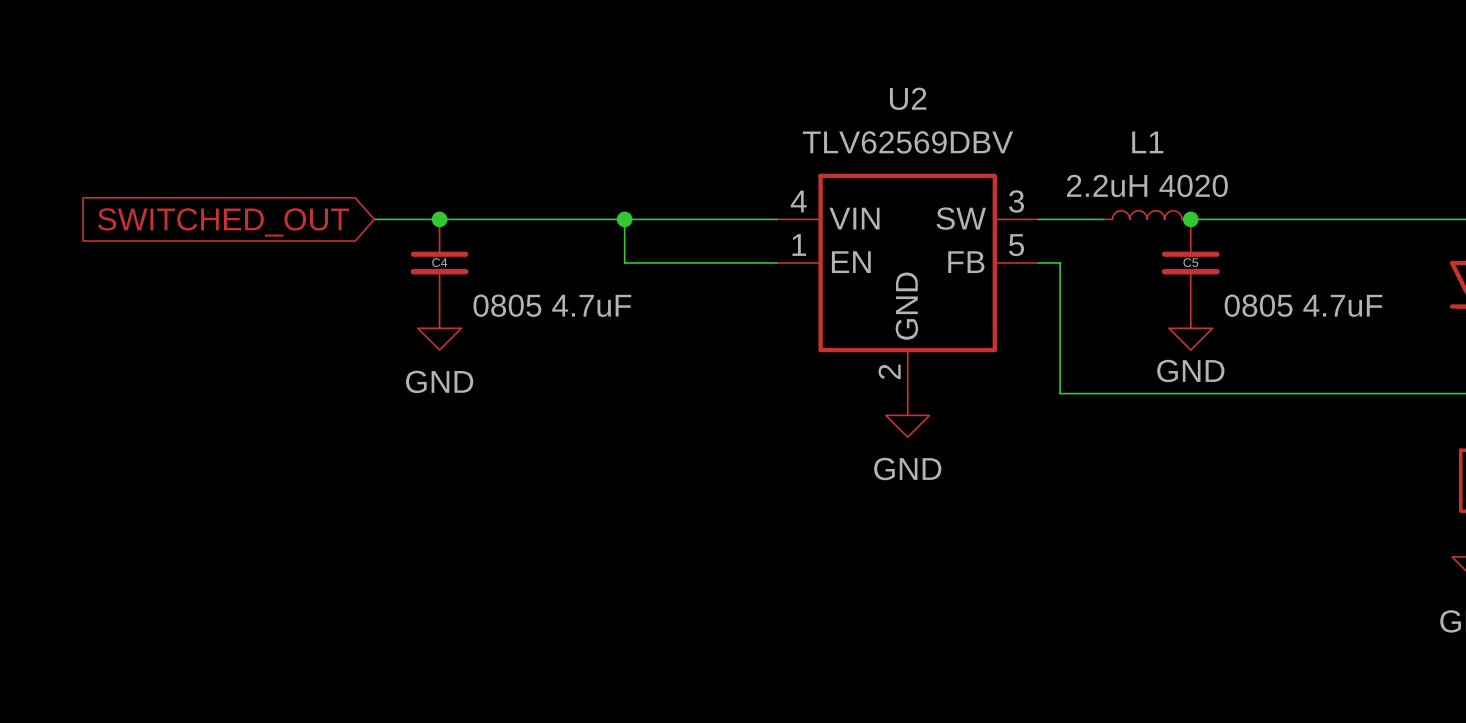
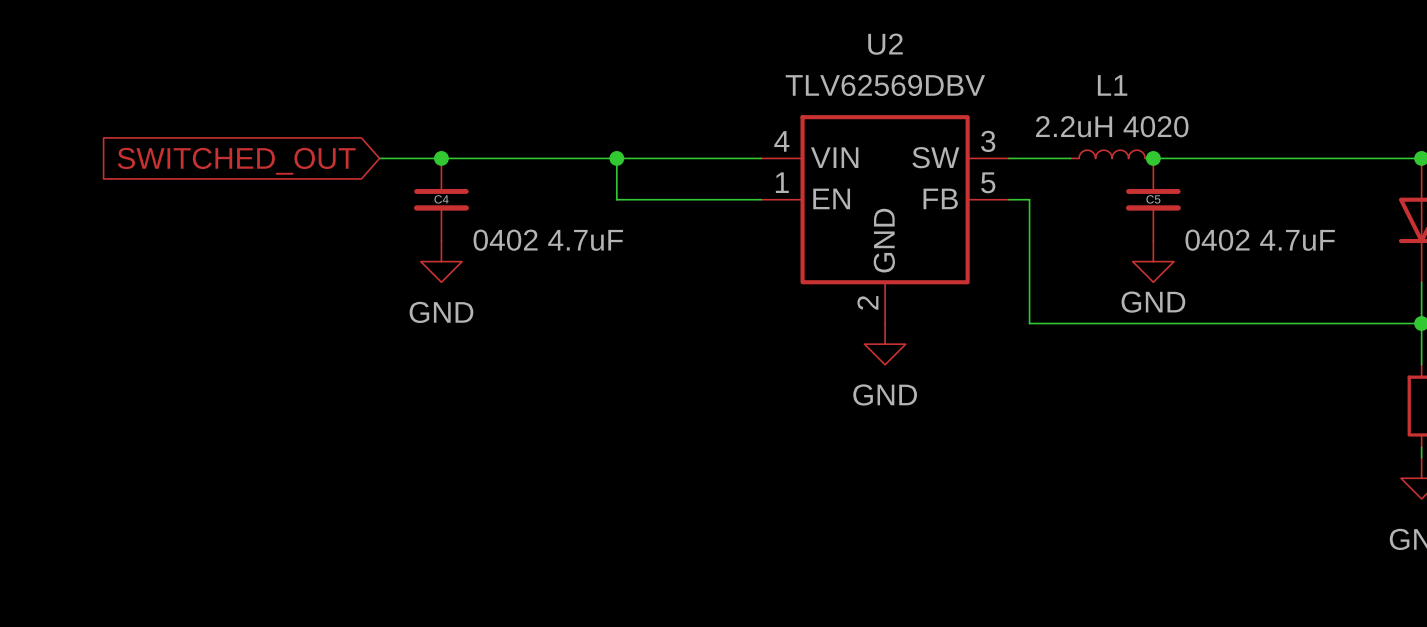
C4 value: 0805 4.7uF (552, 305) -> 0402 4.7uF (548, 240)
C5 value: 0805 4.7uF (1303, 305) -> 0402 4.7uF (1260, 240)

